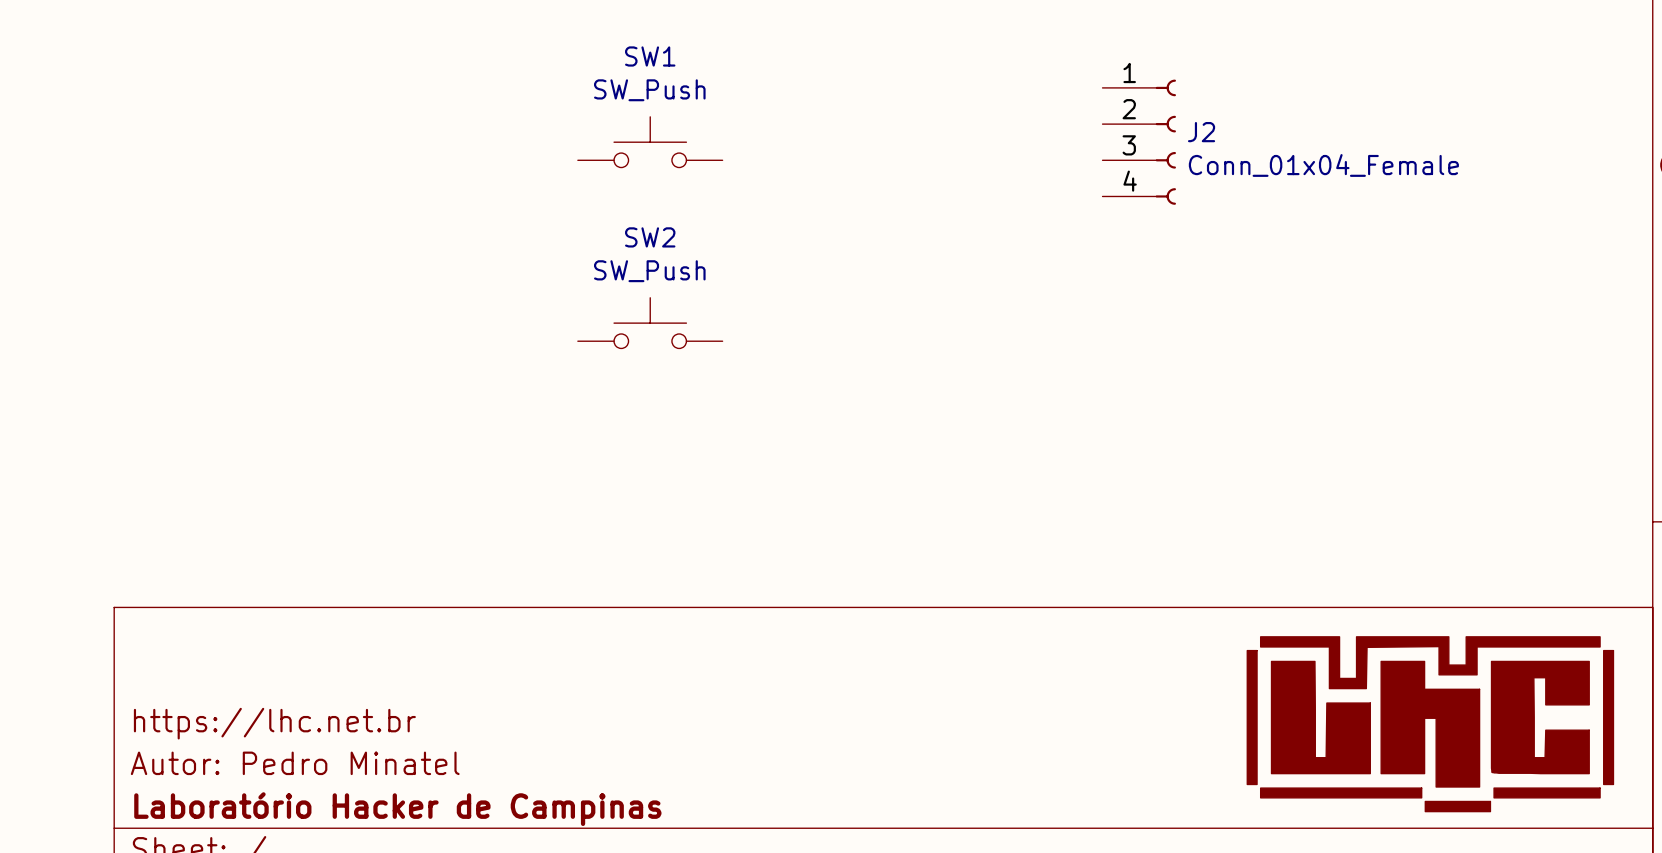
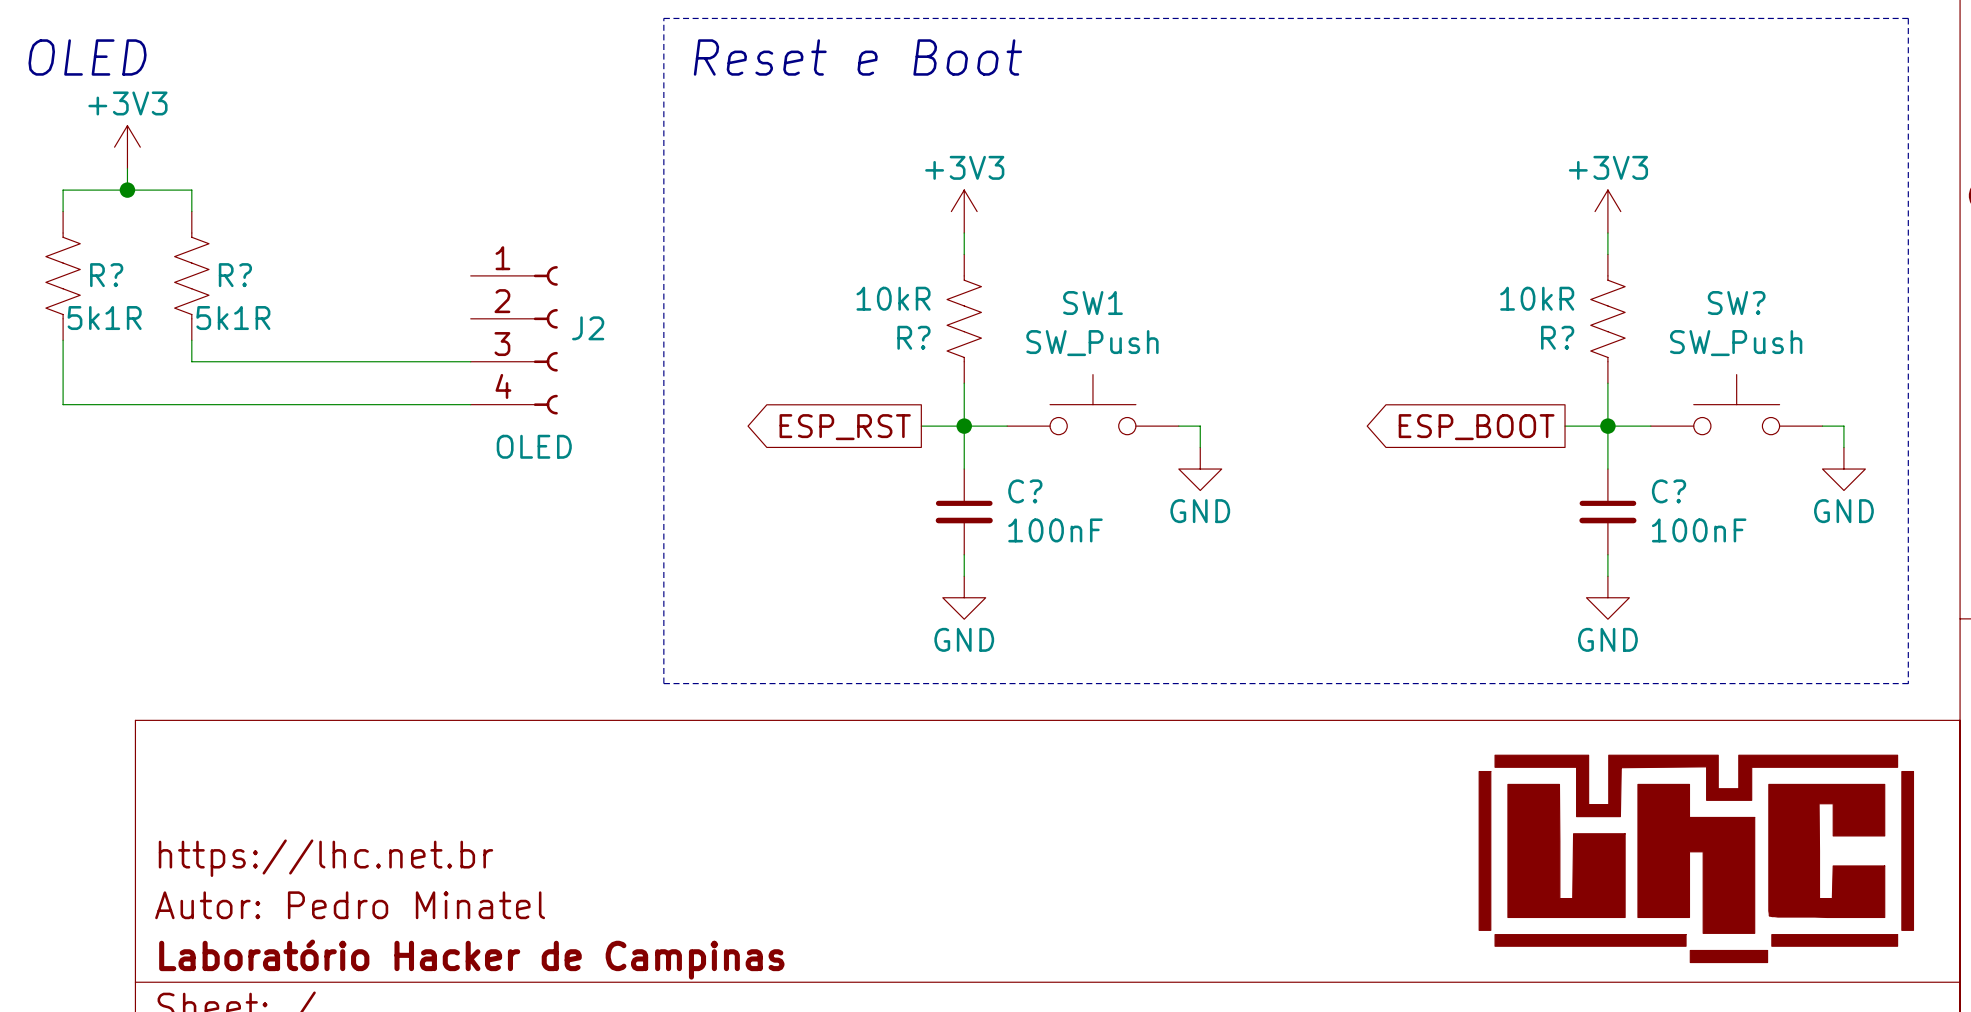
line: none -> (663, 18) (1908, 18) (1908, 683) (663, 683) (663, 18)
text: none -> OLED (87, 57)
text: none -> Reset e Boot (857, 57)
power symbol: none -> +3V3 (127, 147)
wire: none -> (127, 168) (127, 190)
SW1 position: (650, 142) -> (1092, 404)
J2 position: (1139, 142) -> (514, 340)
junction: none -> (127, 190)
J2 value: Conn_01x04_Female (1323, 165) -> OLED (534, 446)
wire: none -> (63, 211) (63, 190) (191, 190) (191, 211)
power symbol: none -> +3V3 (964, 211)
power symbol: none -> +3V3 (1607, 211)
wire: none -> (964, 233) (964, 254)
wire: none -> (1607, 233) (1607, 254)
R?: none -> 5k1R (63, 275)
R?: none -> 5k1R (191, 275)
R?: none -> 10kR (964, 318)
R?: none -> 10kR (1607, 318)
wire: none -> (63, 340) (63, 404) (470, 404)
wire: none -> (191, 340) (191, 361) (470, 361)
SW2: SW_Push (650, 323) -> none
wire: none -> (964, 383) (964, 469)
wire: none -> (1607, 383) (1607, 469)
SW?: none -> SW_Push (1736, 404)
wire: none -> (921, 426) (1007, 426)
junction: none -> (964, 426)
wire: none -> (1178, 426) (1200, 426) (1200, 447)
wire: none -> (1565, 426) (1650, 426)
junction: none -> (1607, 426)
wire: none -> (1822, 426) (1843, 426) (1843, 447)
global label: none -> ESP_RST (845, 427)
global label: none -> ESP_BOOT (1476, 427)
power symbol: none -> GND (1200, 469)
power symbol: none -> GND (1843, 469)
C?: none -> 100nF (964, 511)
C?: none -> 100nF (1607, 511)
wire: none -> (964, 554) (964, 576)
wire: none -> (1607, 554) (1607, 576)
power symbol: none -> GND (964, 597)
power symbol: none -> GND (1607, 597)

